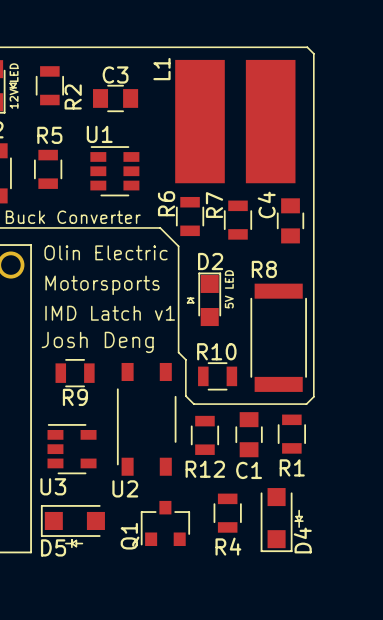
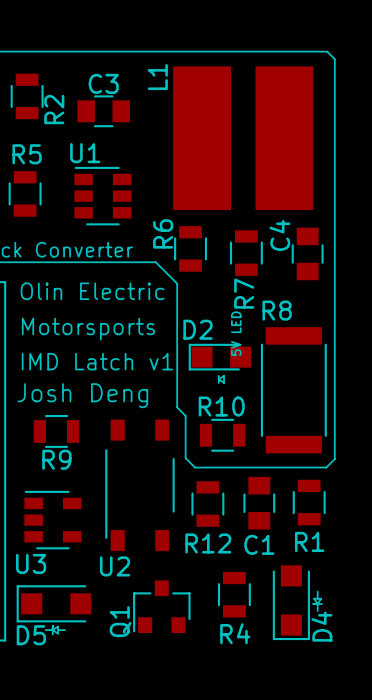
R7 name position: R7 (214, 205) -> R7 (244, 293)
D2 rotation: 0° (204, 299) -> 90° counterclockwise (219, 363)

